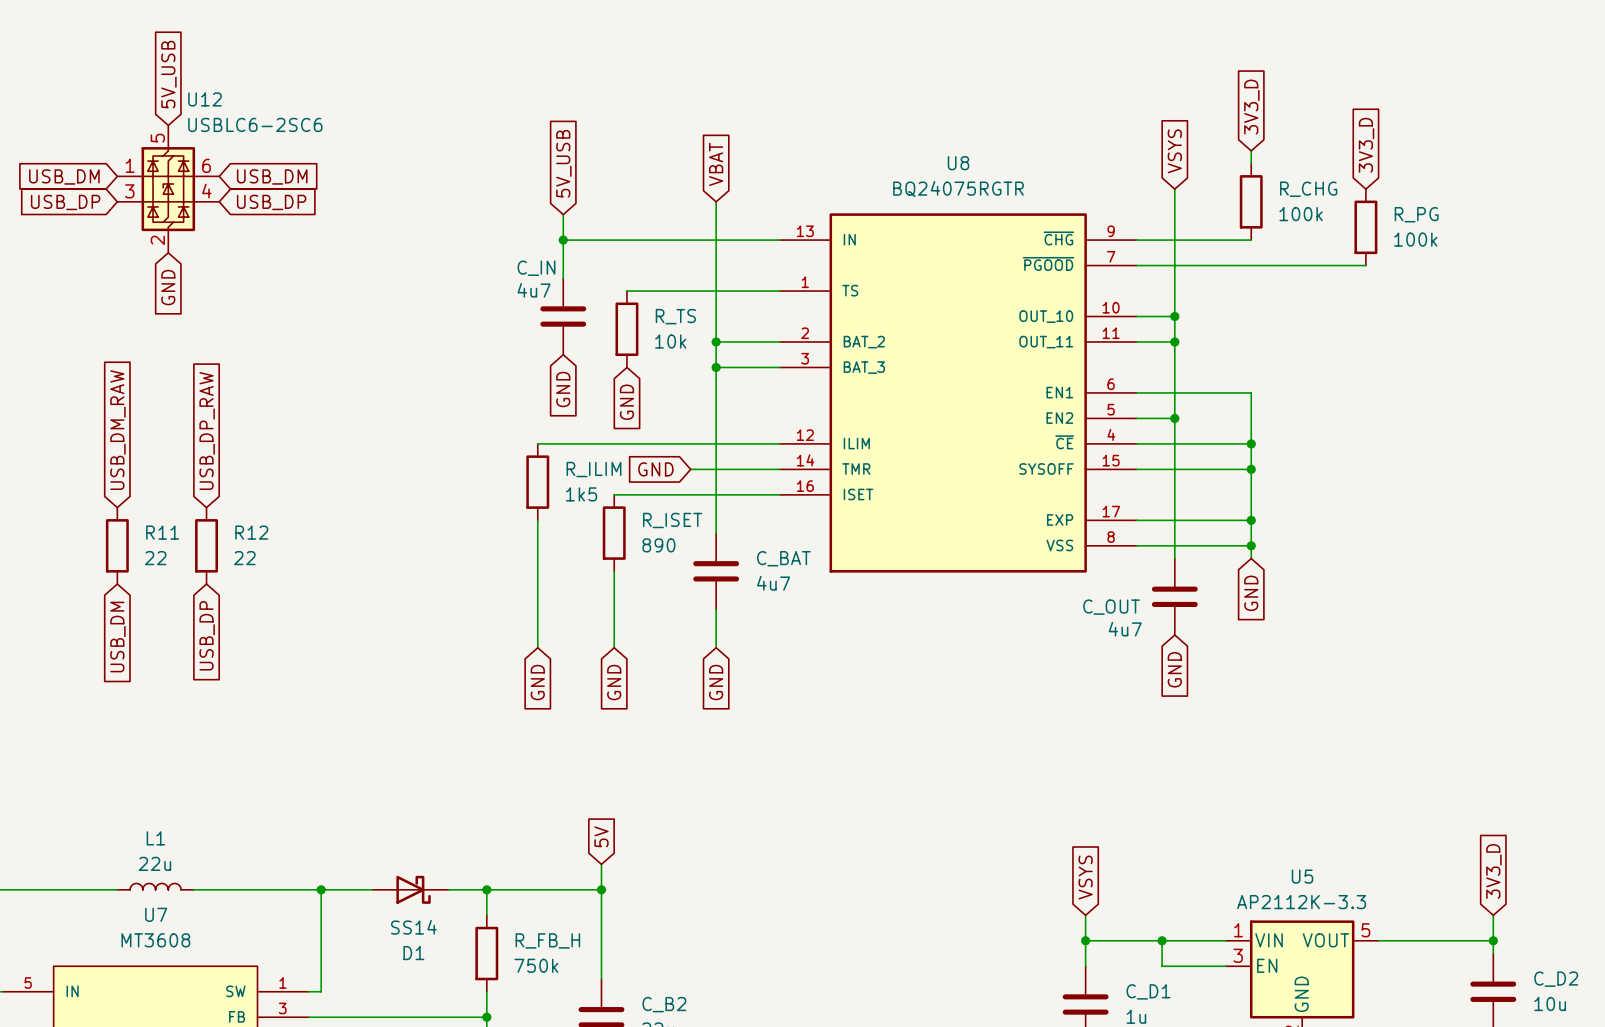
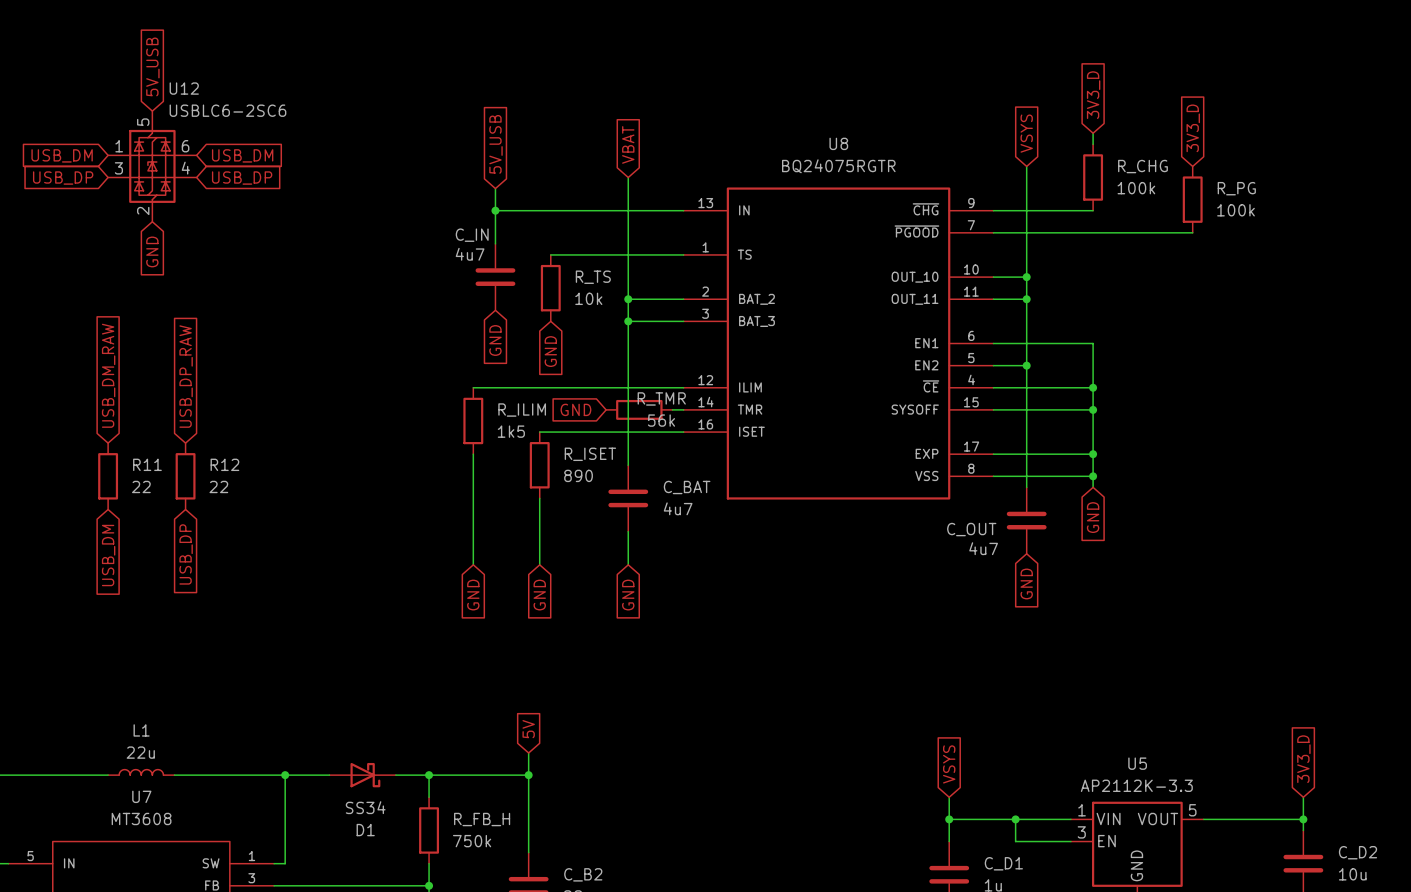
wire: (690, 469) (767, 469) -> none
R_TMR: none -> 56k (639, 409)
D1 value: SS14 (413, 927) -> SS34 (365, 807)

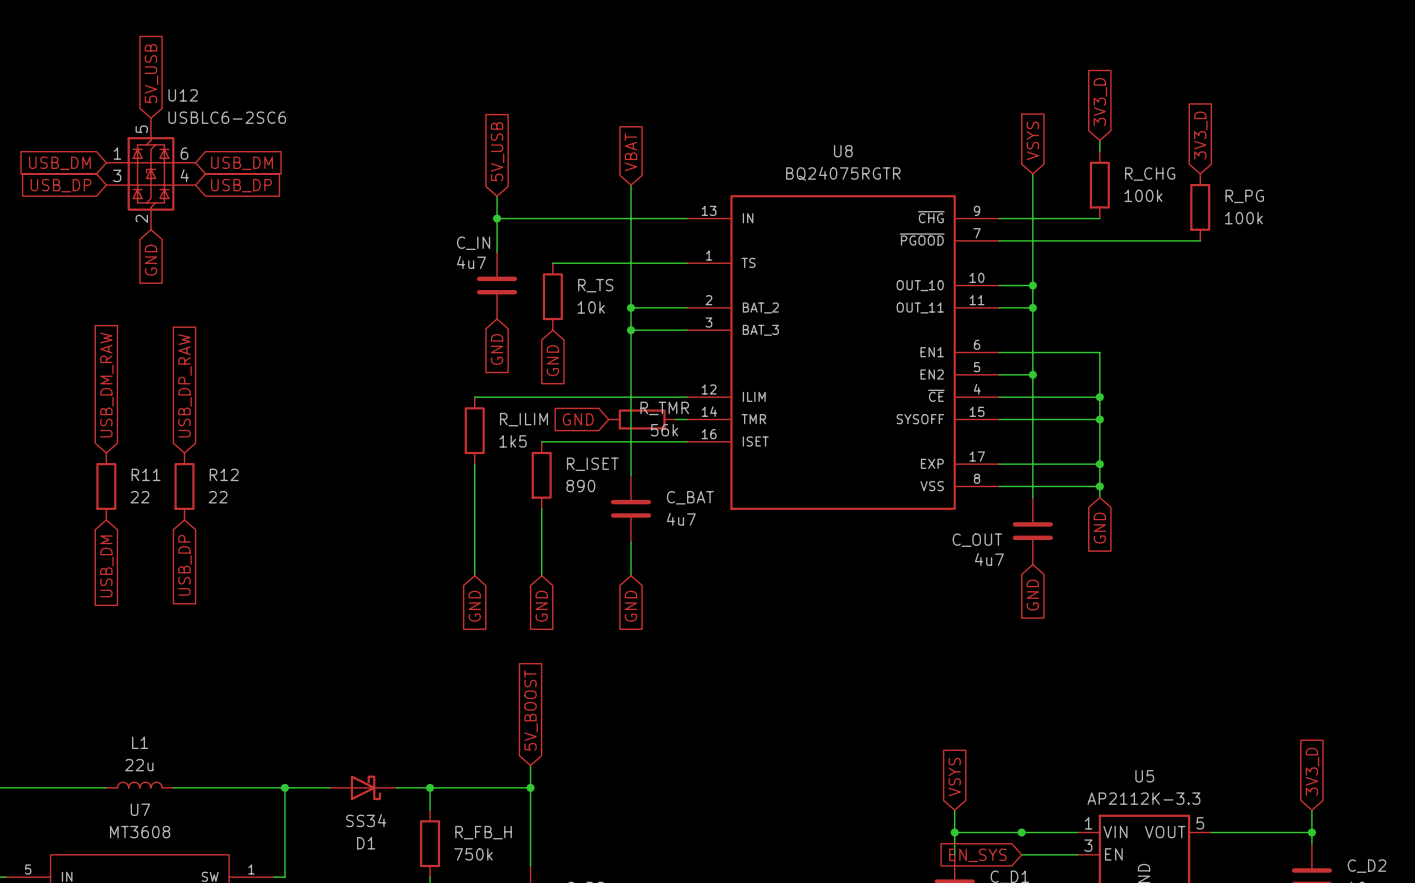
global label: 5V (528, 729) -> 5V_BOOST (531, 710)
wire: (1015, 819) (1015, 841) -> none
global label: none -> EN_SYS (977, 855)

